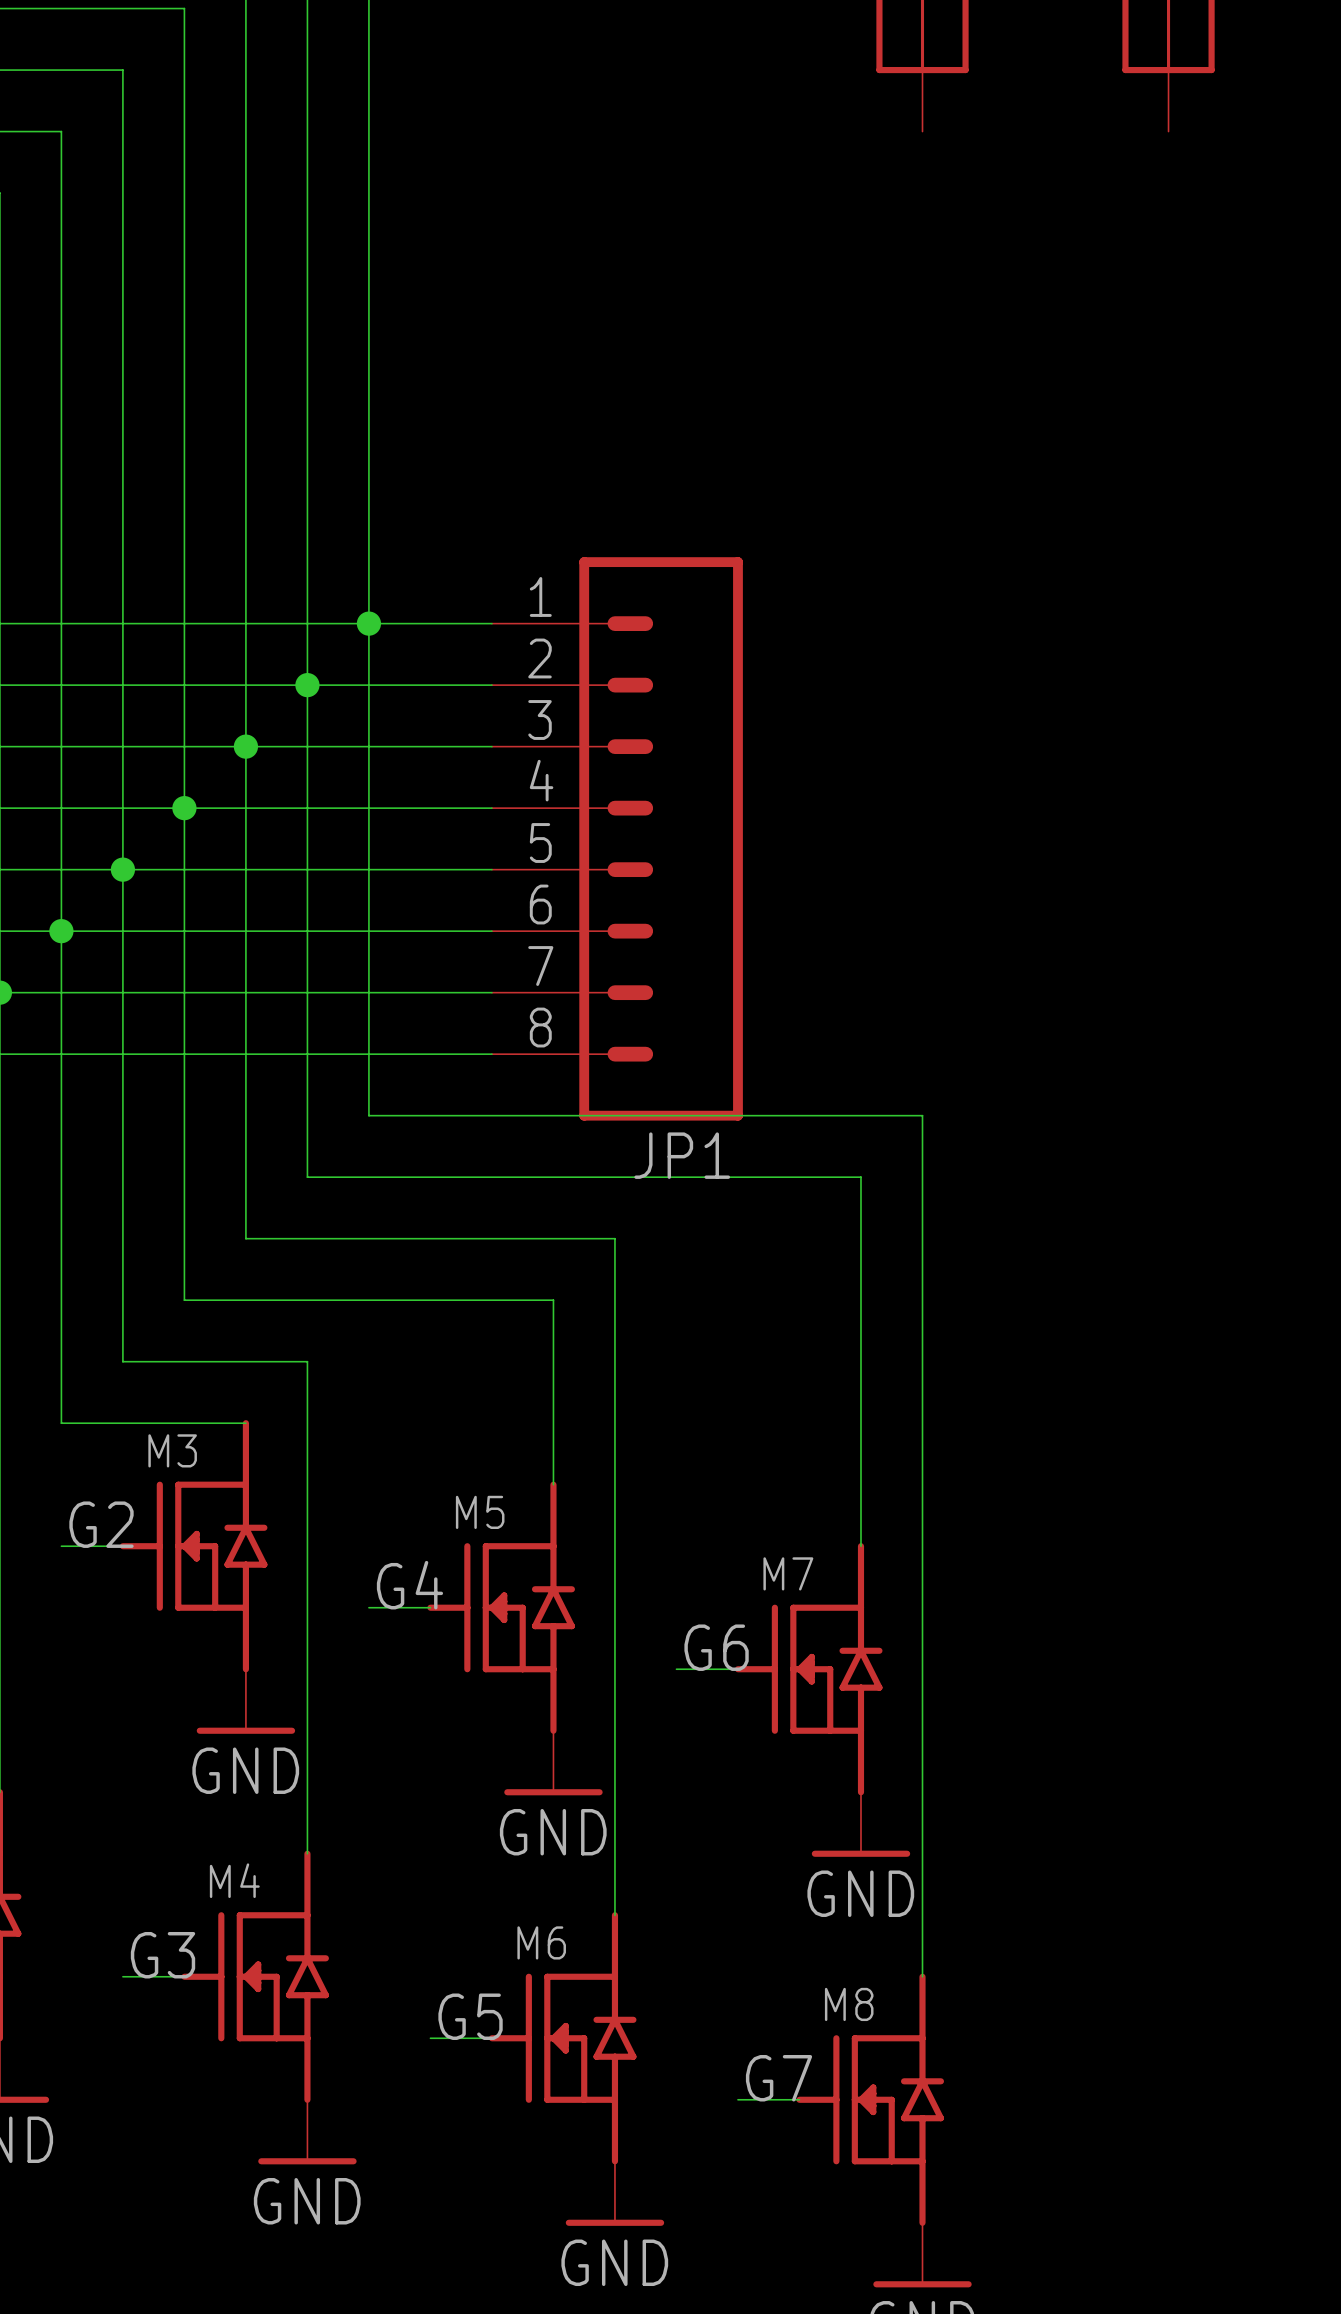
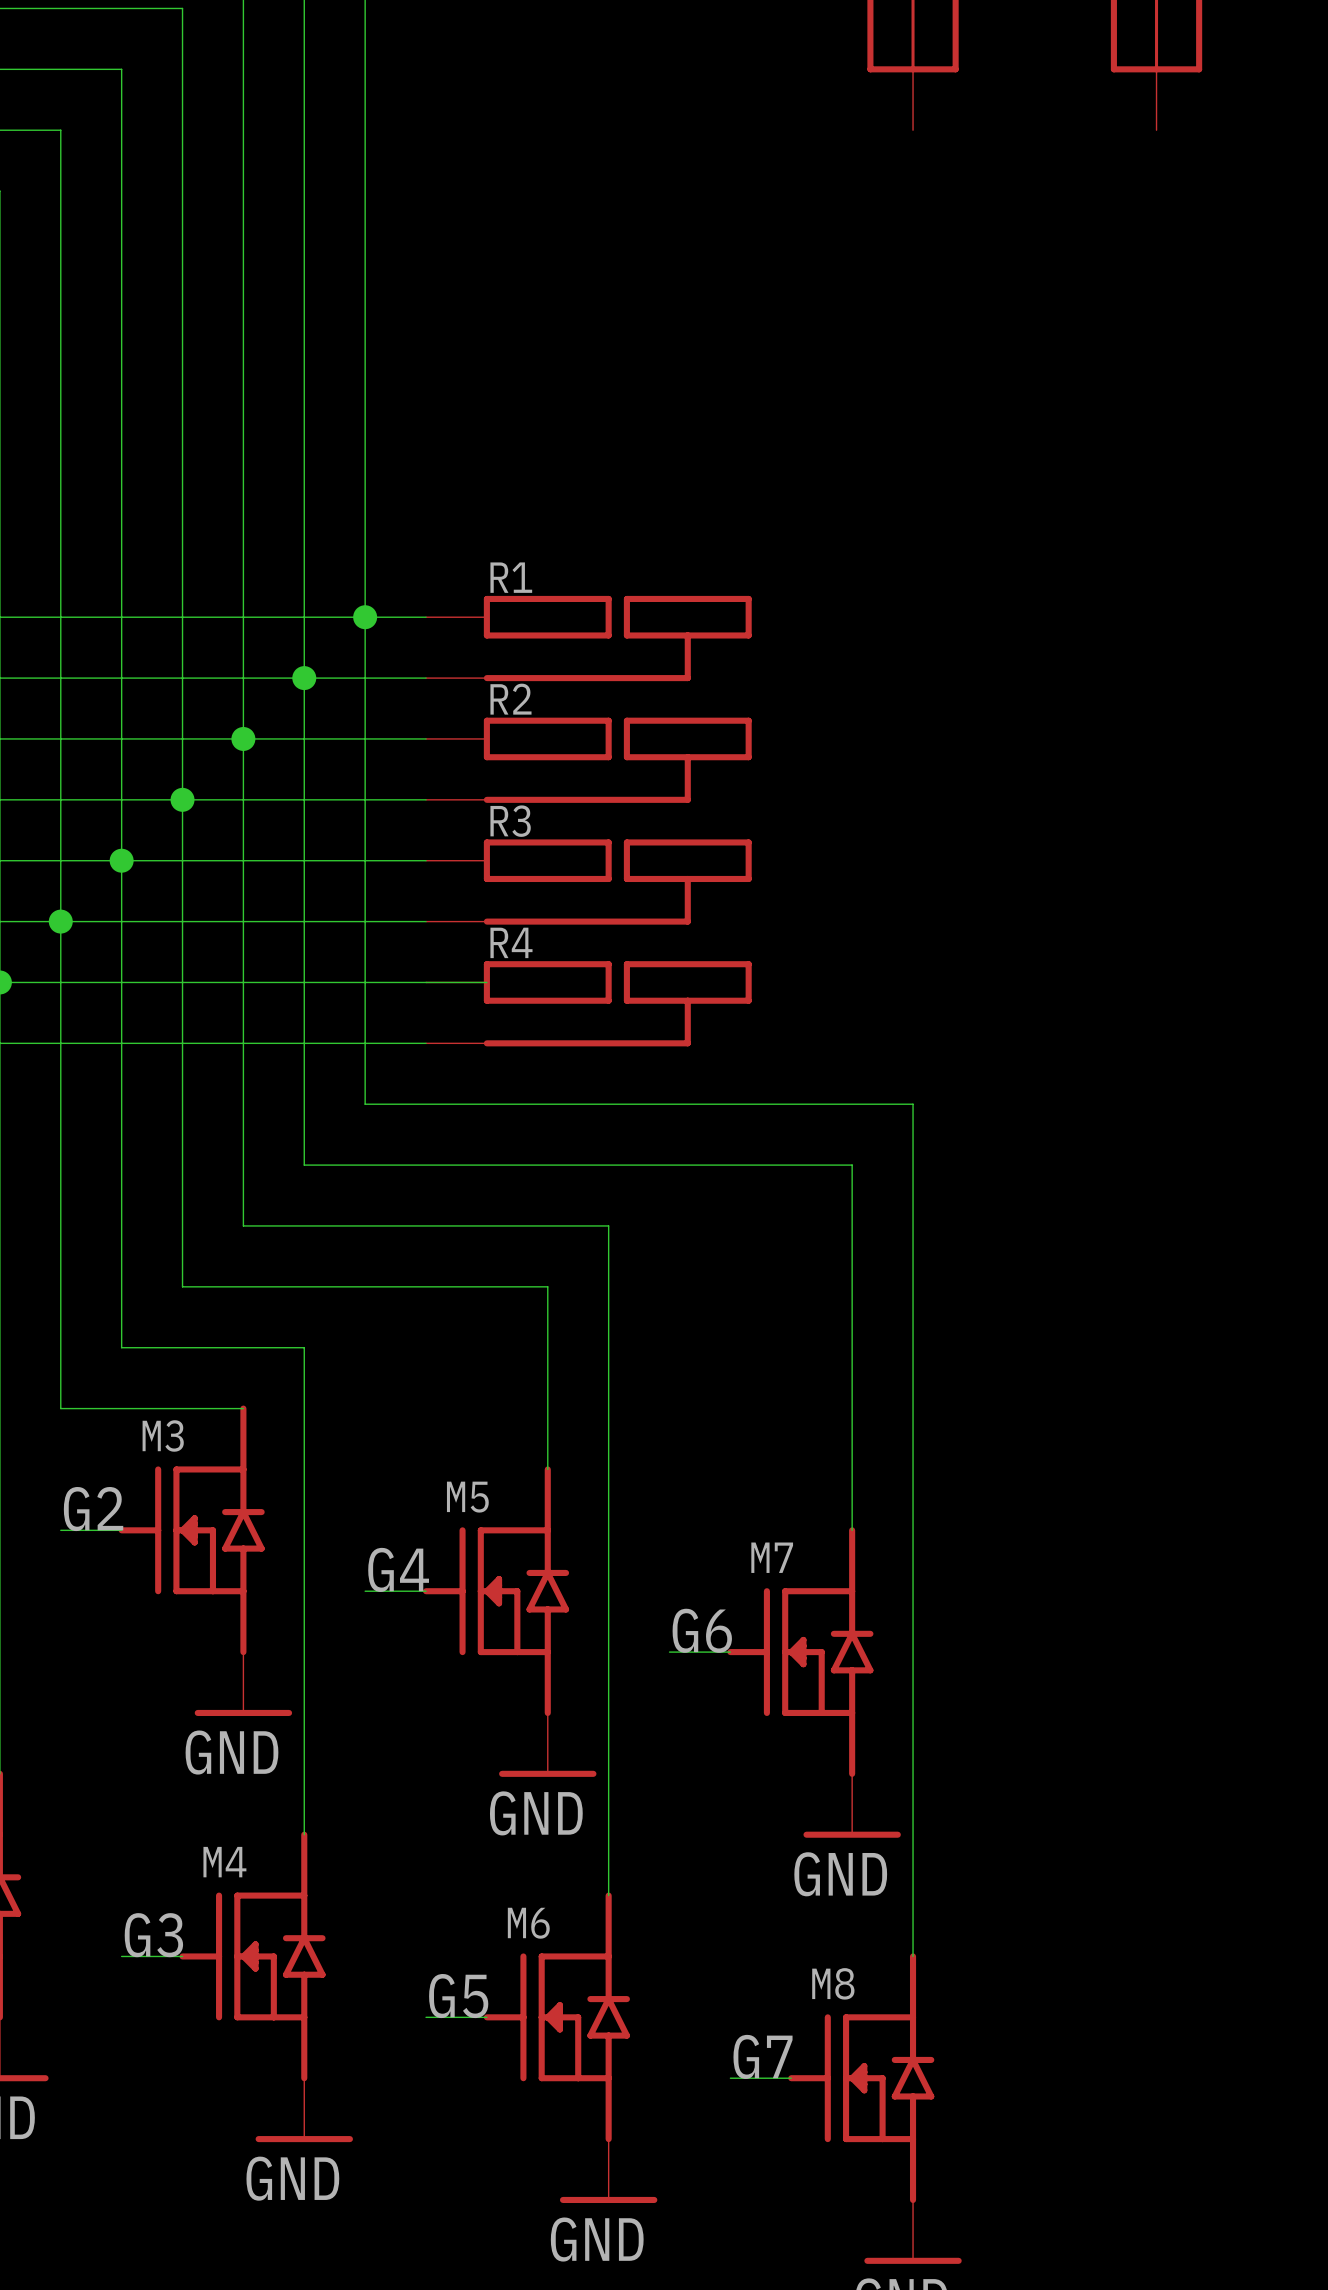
R1: none -> (588, 638)
R2: none -> (588, 760)
JP1: (617, 838) -> none
R3: none -> (588, 882)
R4: none -> (588, 1003)

